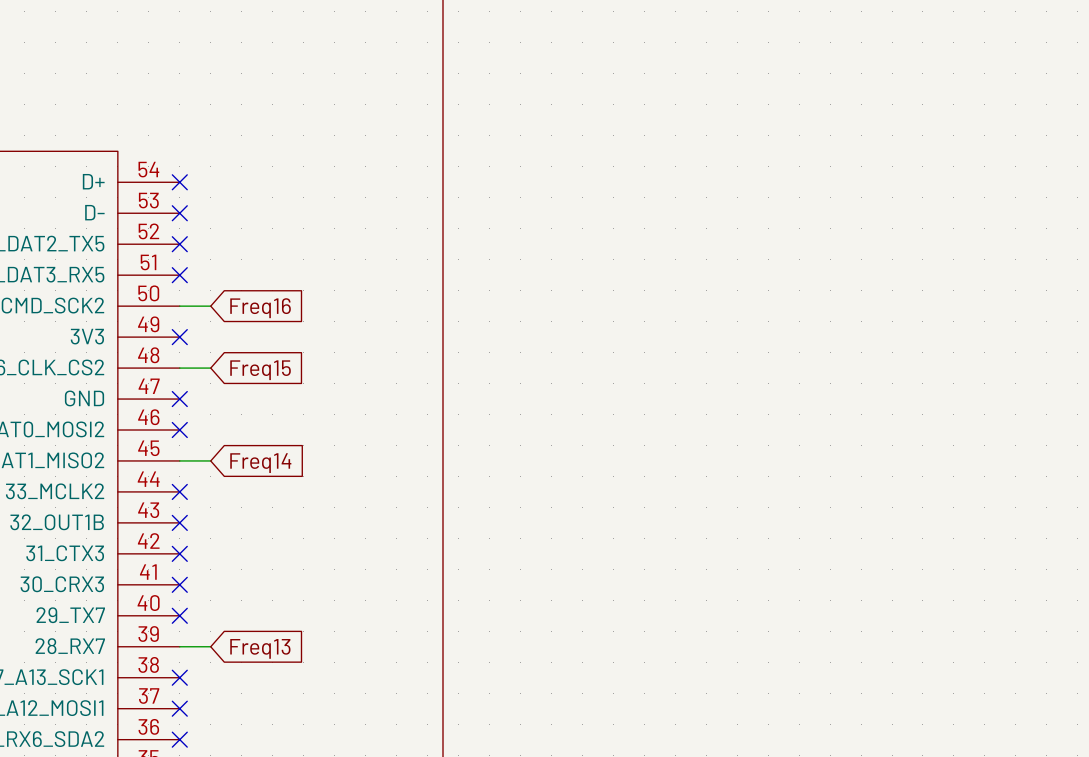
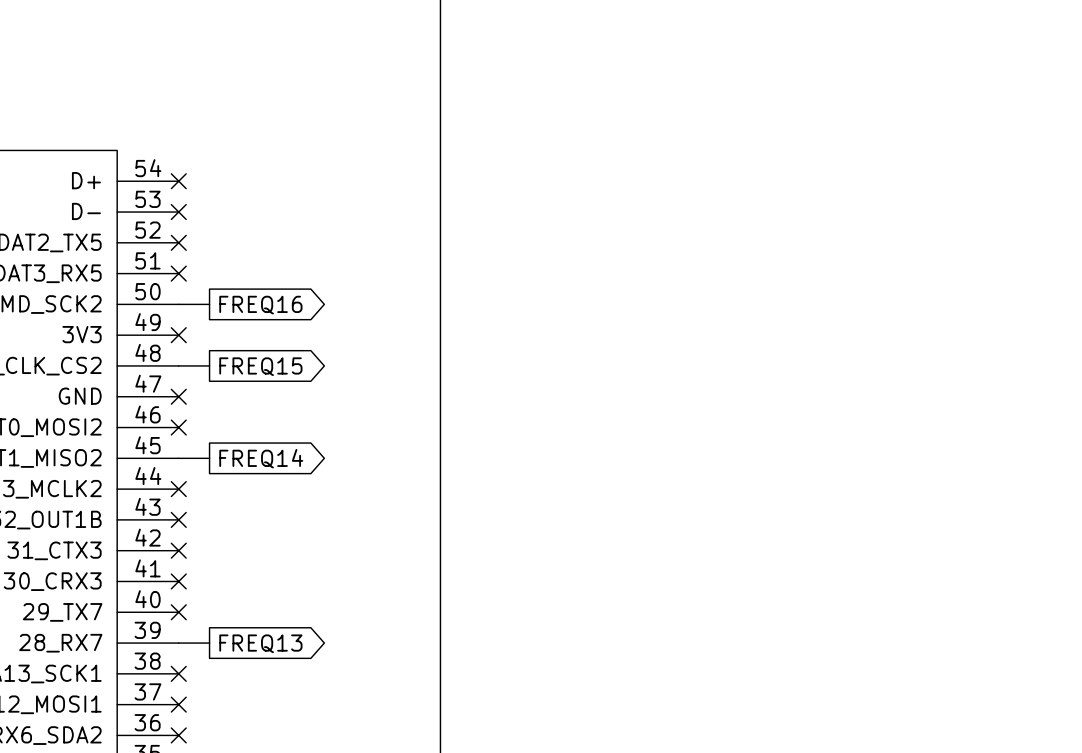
global label shape: input (260, 308) -> output (260, 305)
global label: Freq16 (260, 308) -> FREQ16 (260, 305)
global label shape: input (260, 370) -> output (260, 366)
global label: Freq15 (260, 370) -> FREQ15 (260, 366)
global label shape: input (260, 463) -> output (261, 458)
global label: Freq14 (260, 463) -> FREQ14 (261, 458)
global label shape: input (260, 648) -> output (260, 643)
global label: Freq13 (260, 648) -> FREQ13 (260, 643)

